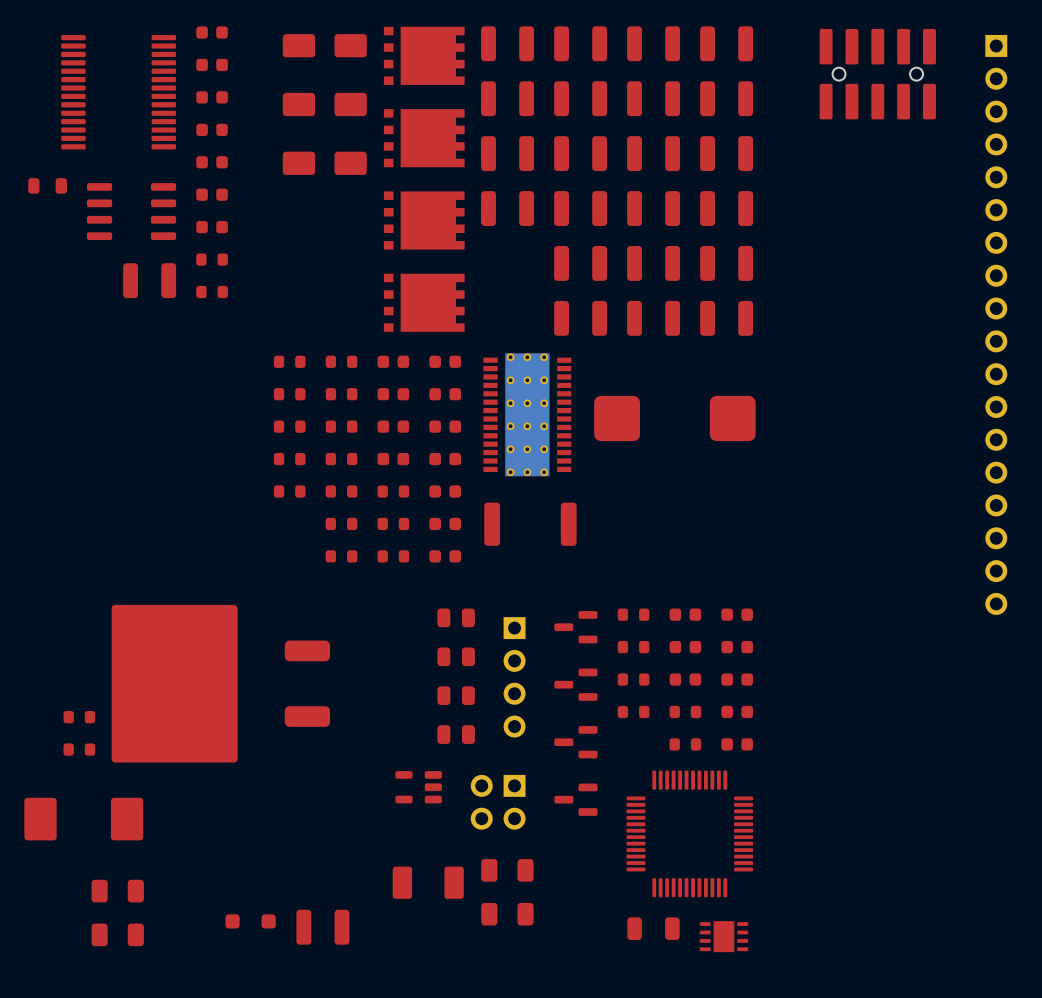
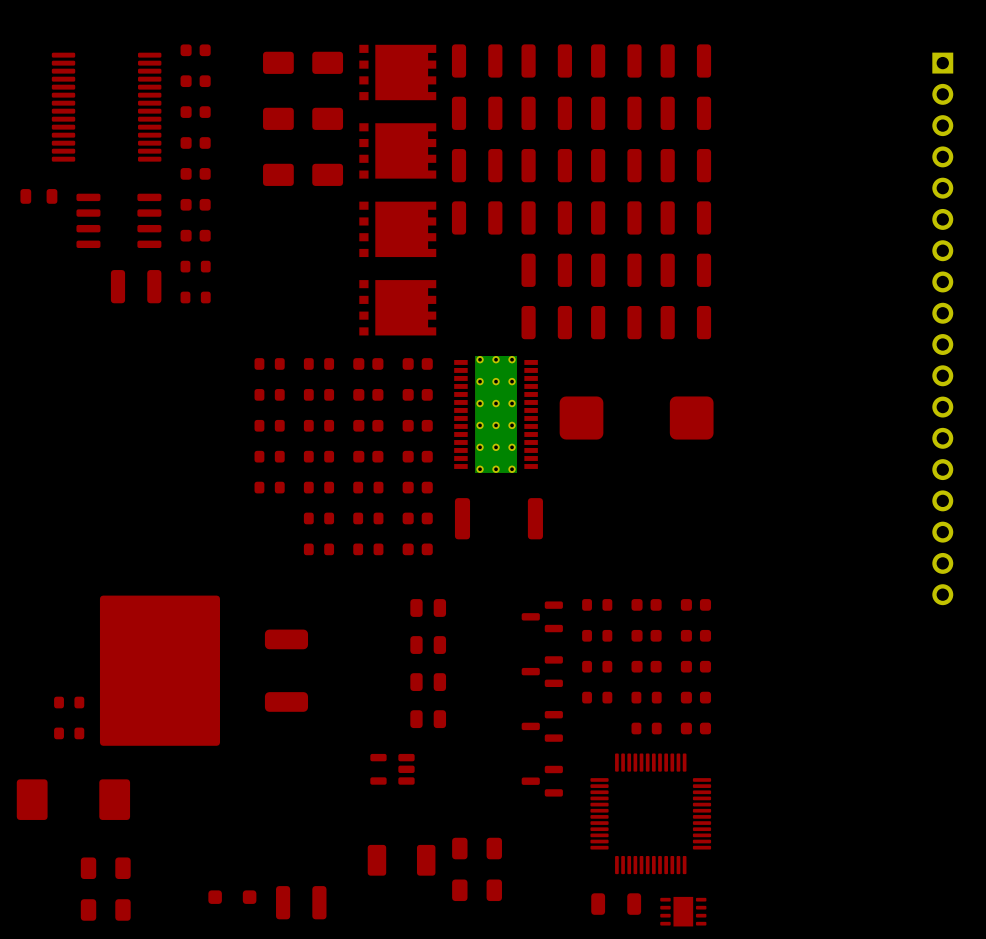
part: (877, 74) -> none
part: (514, 677) -> none
part: (498, 802) -> none

